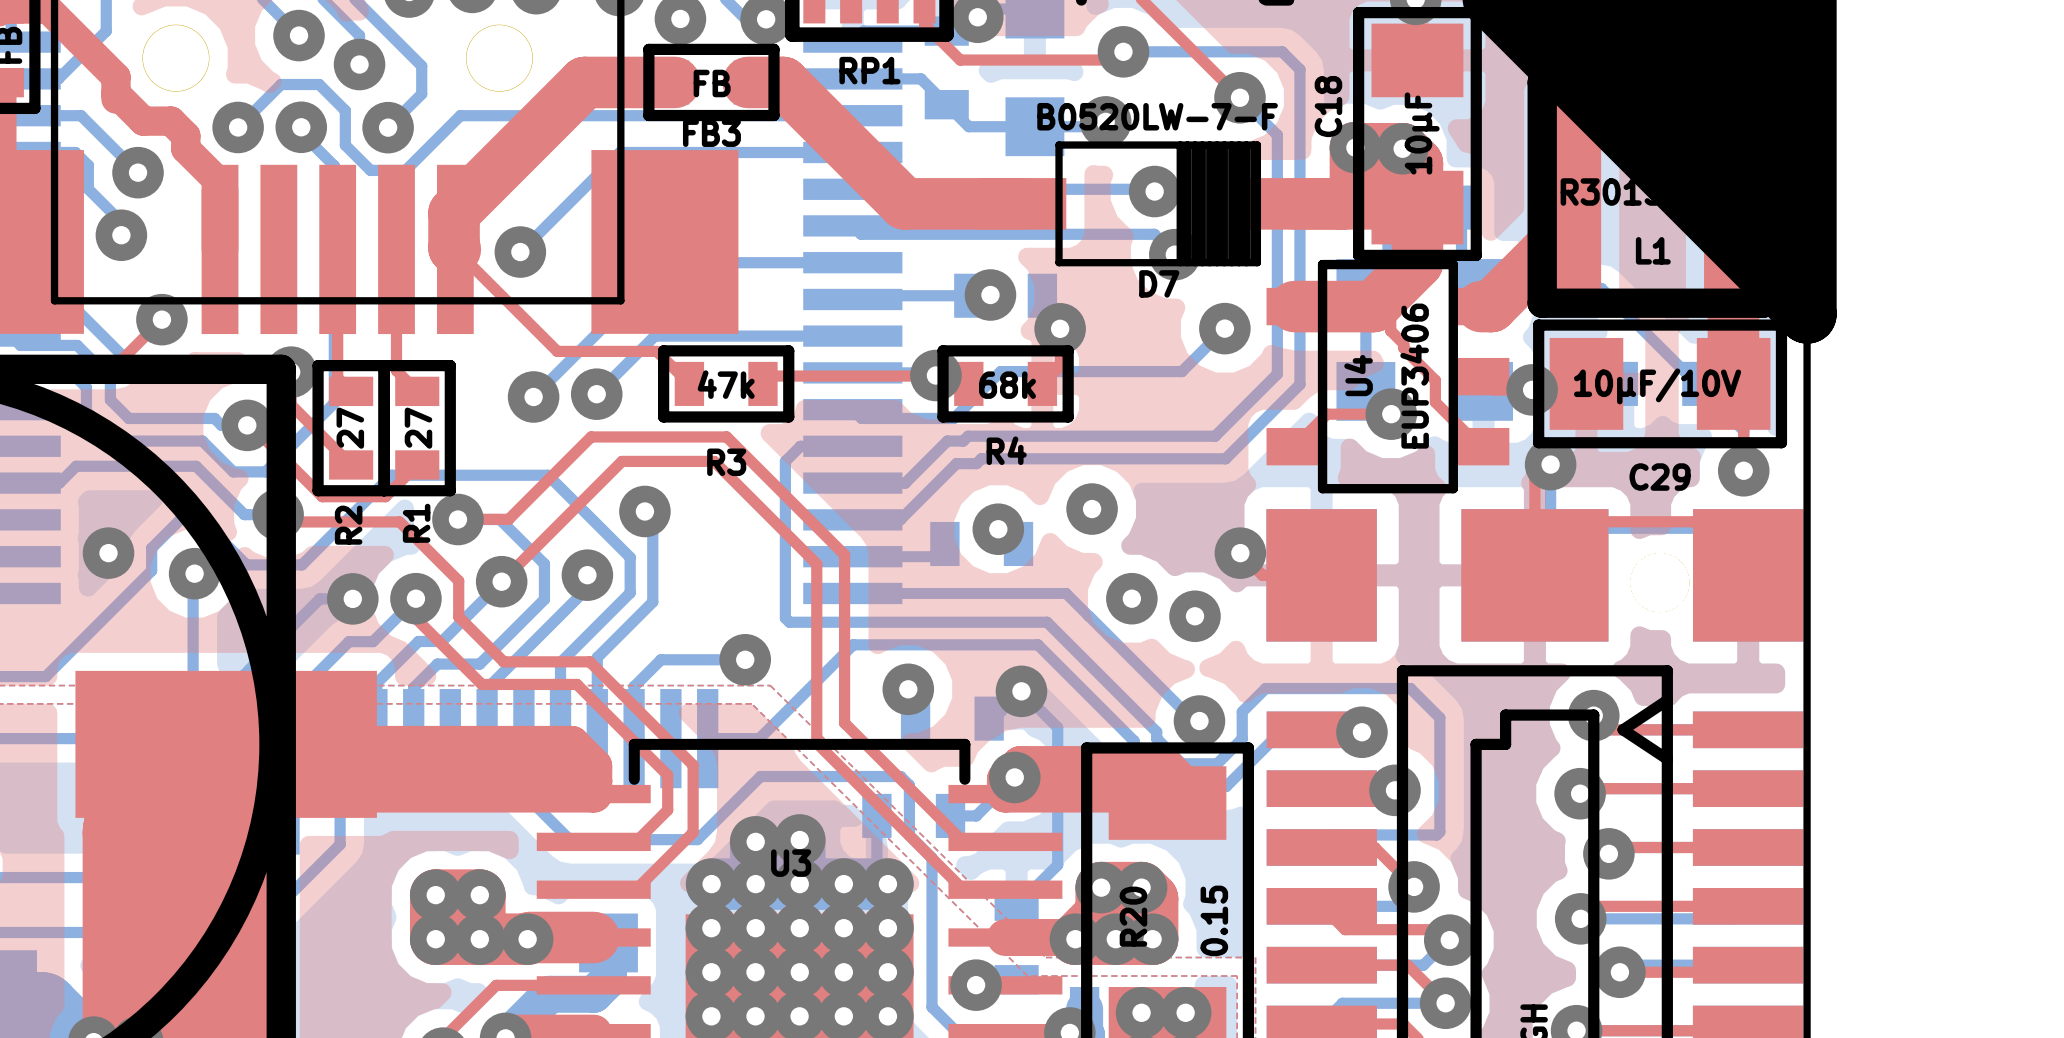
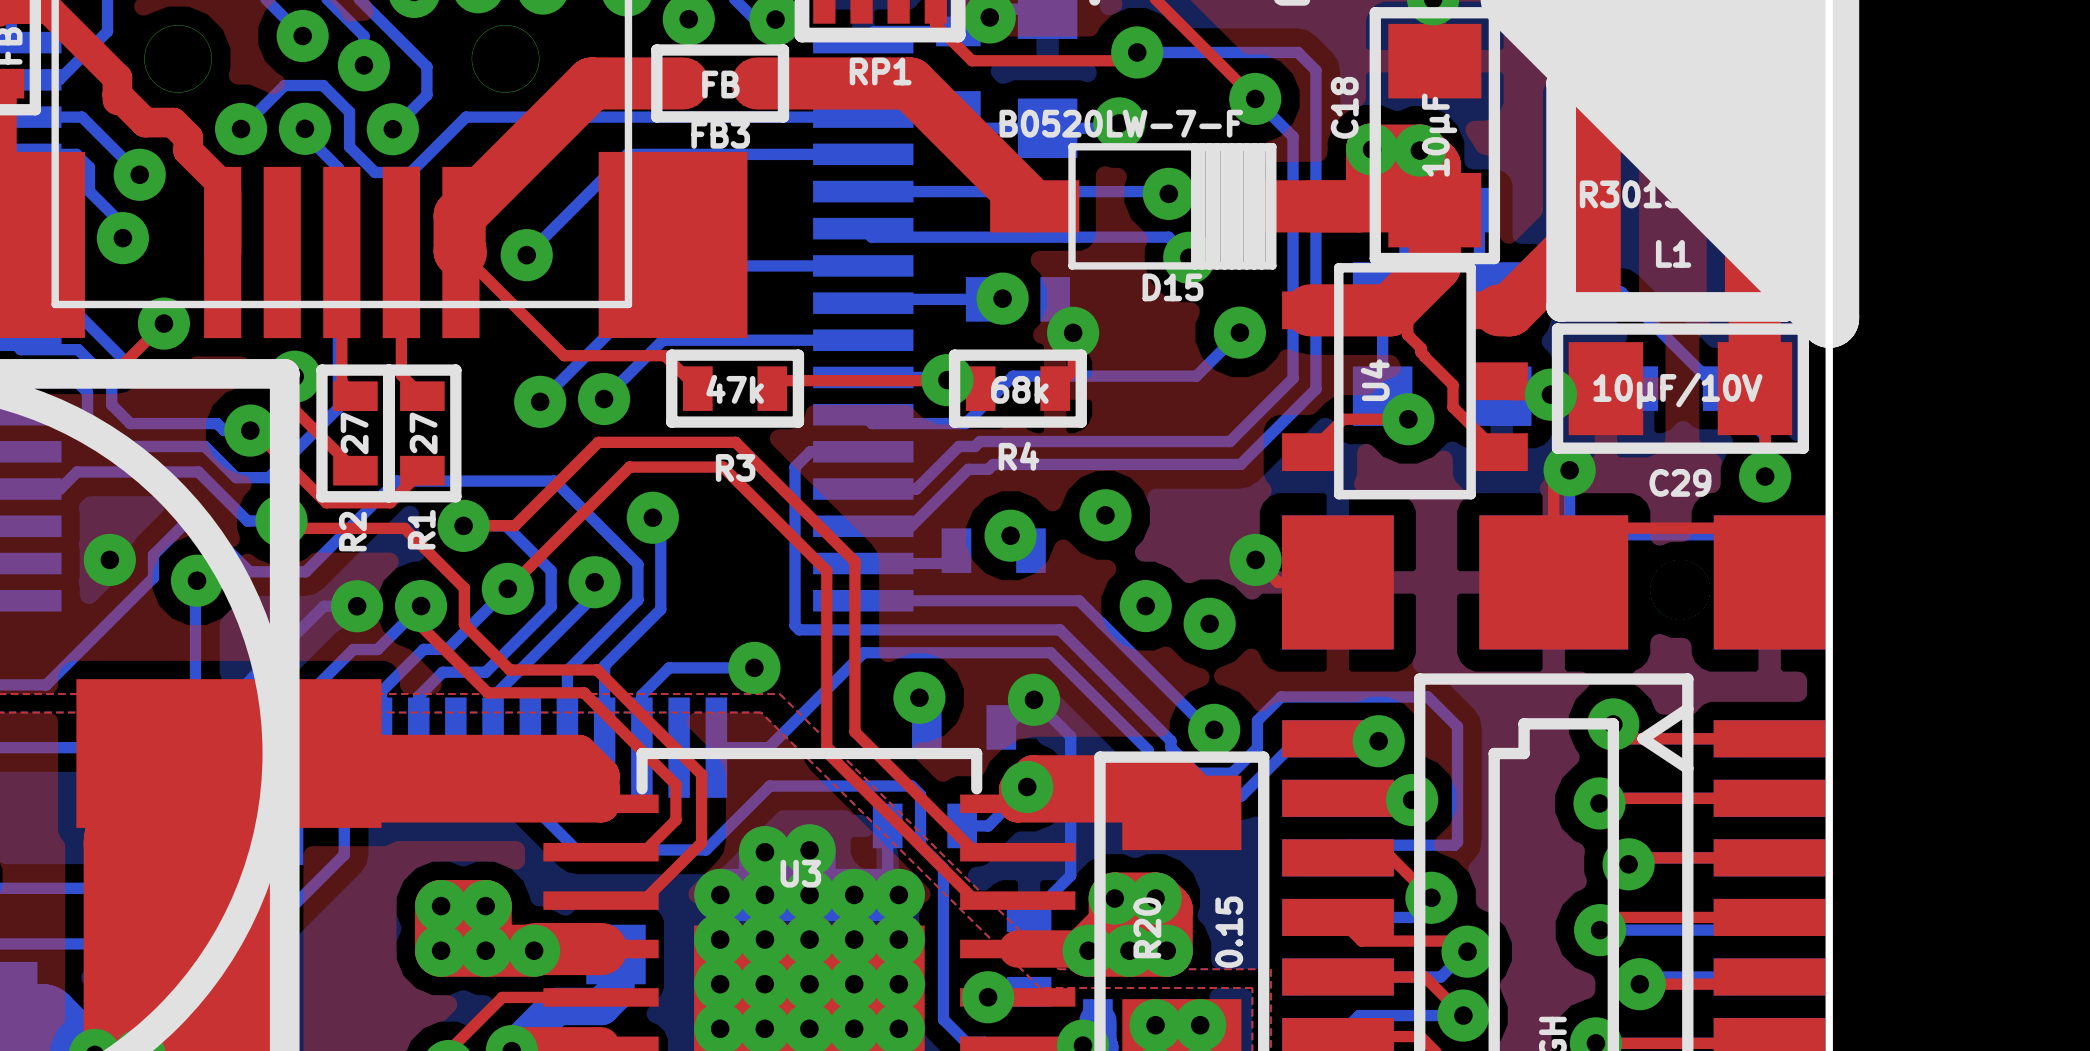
top track: (783, 82) (904, 203) (1022, 203) -> (792, 83) (909, 83) (1032, 206)
D7 value position: B0520LW-7-F (1157, 116) -> B0520LW-7-F (1121, 123)
D7 name: D7 (1159, 283) -> D15 (1172, 287)
U4 value: EUP3406 (1414, 376) -> none

